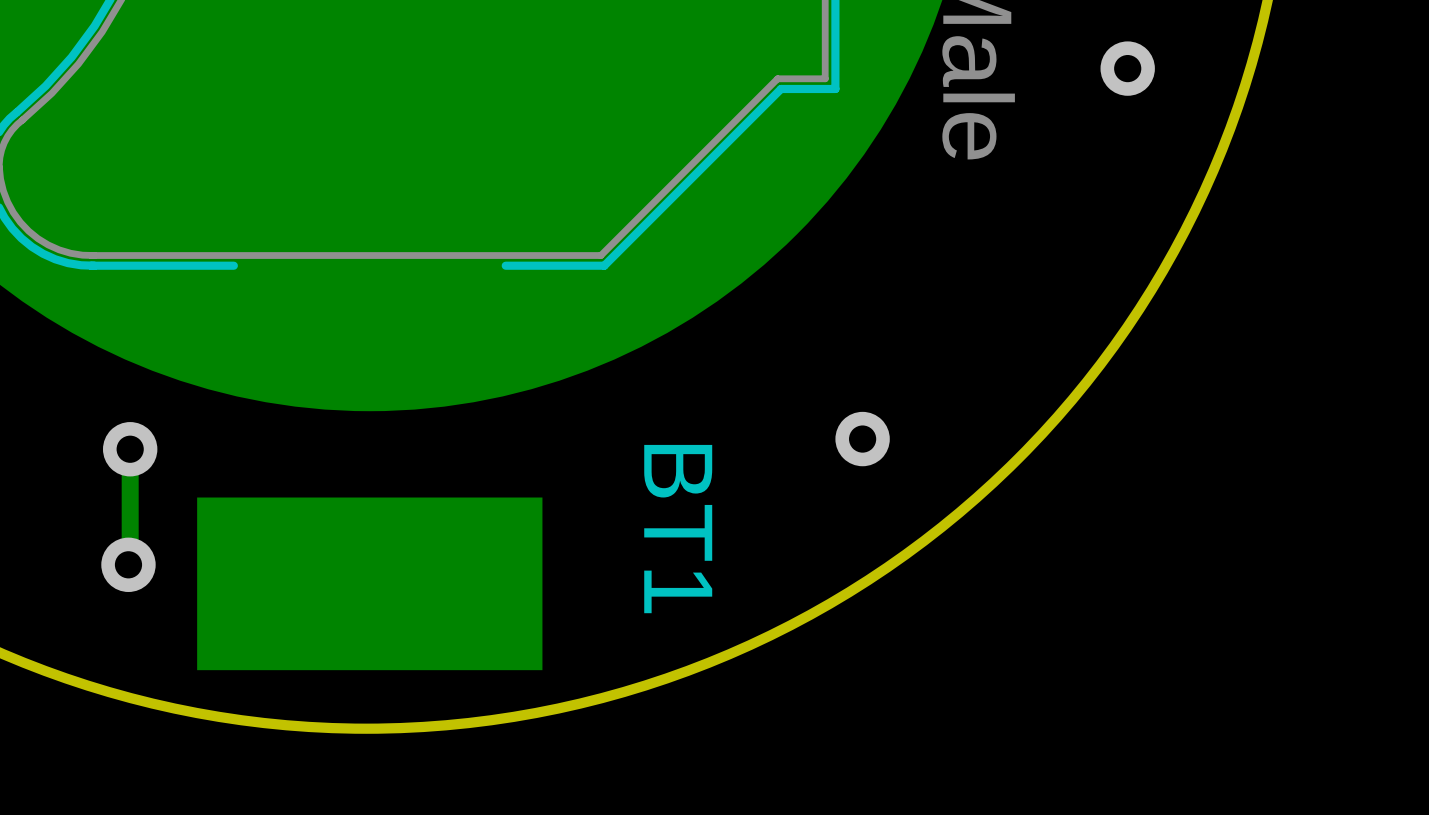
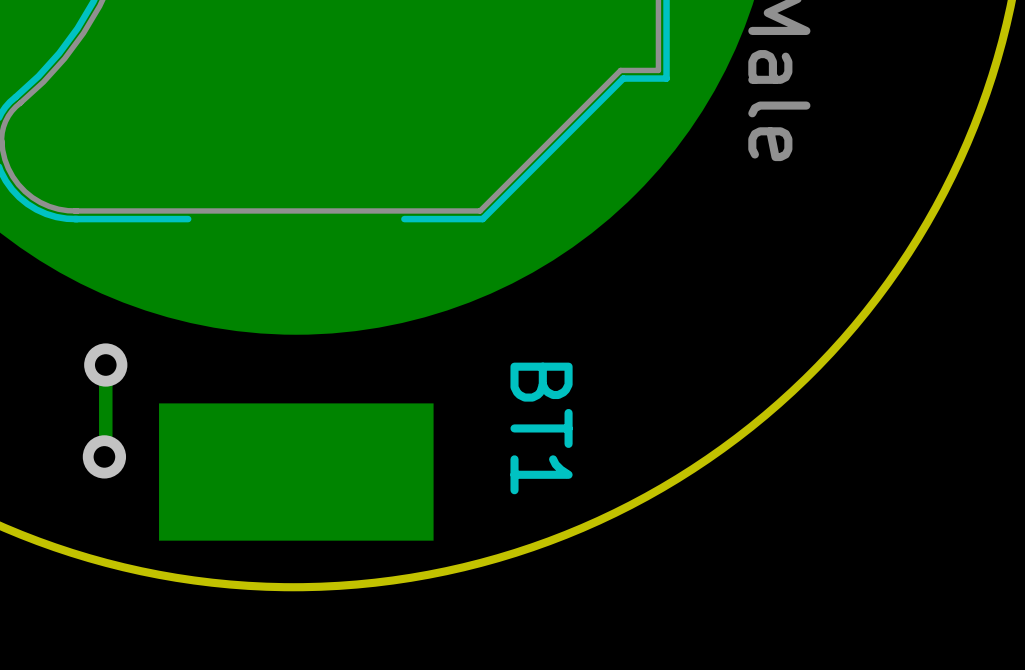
via: (1127, 68) -> none
via: (862, 439) -> none

